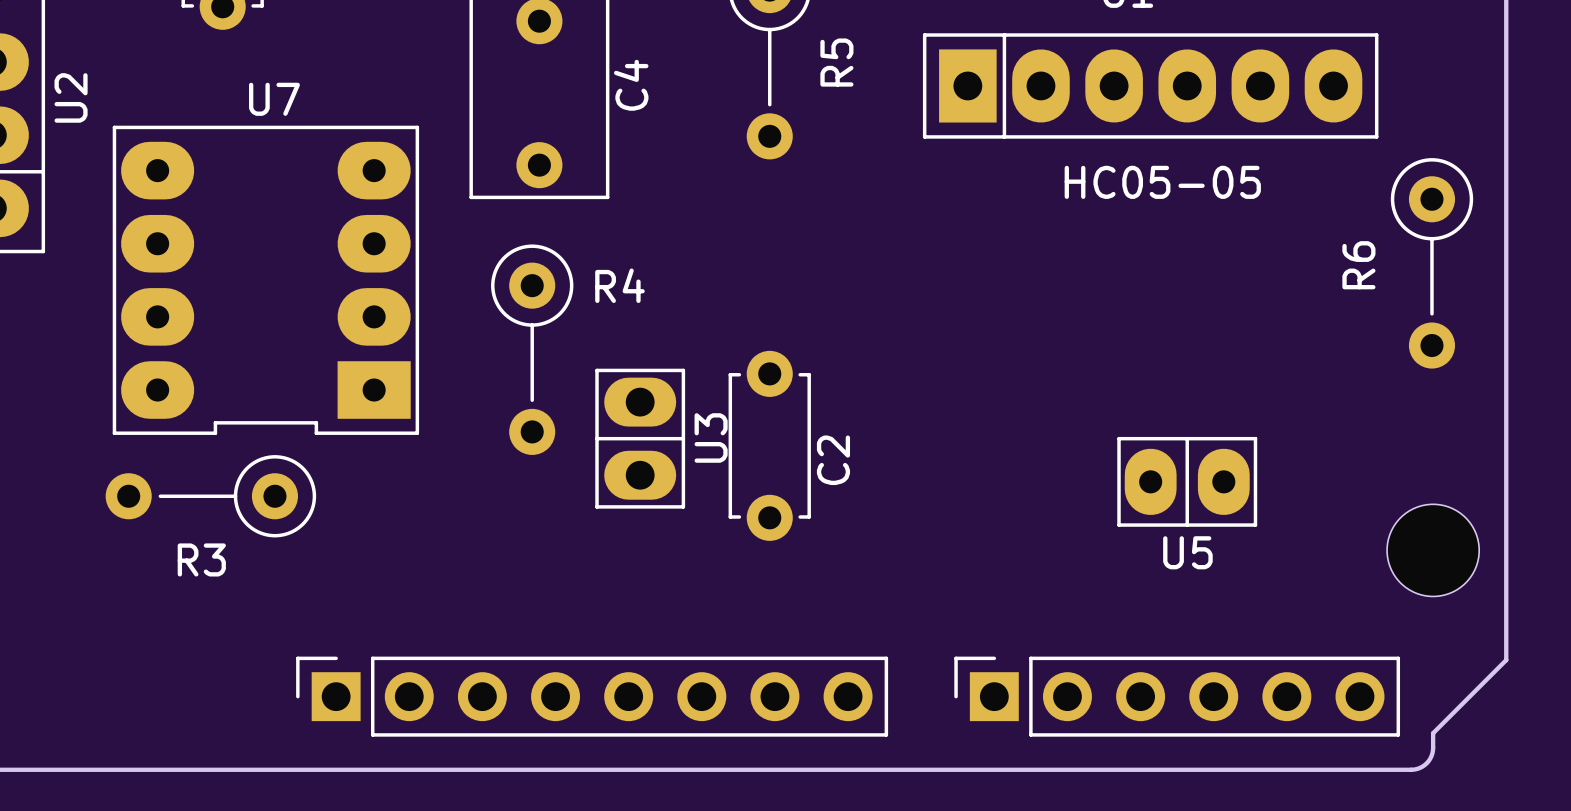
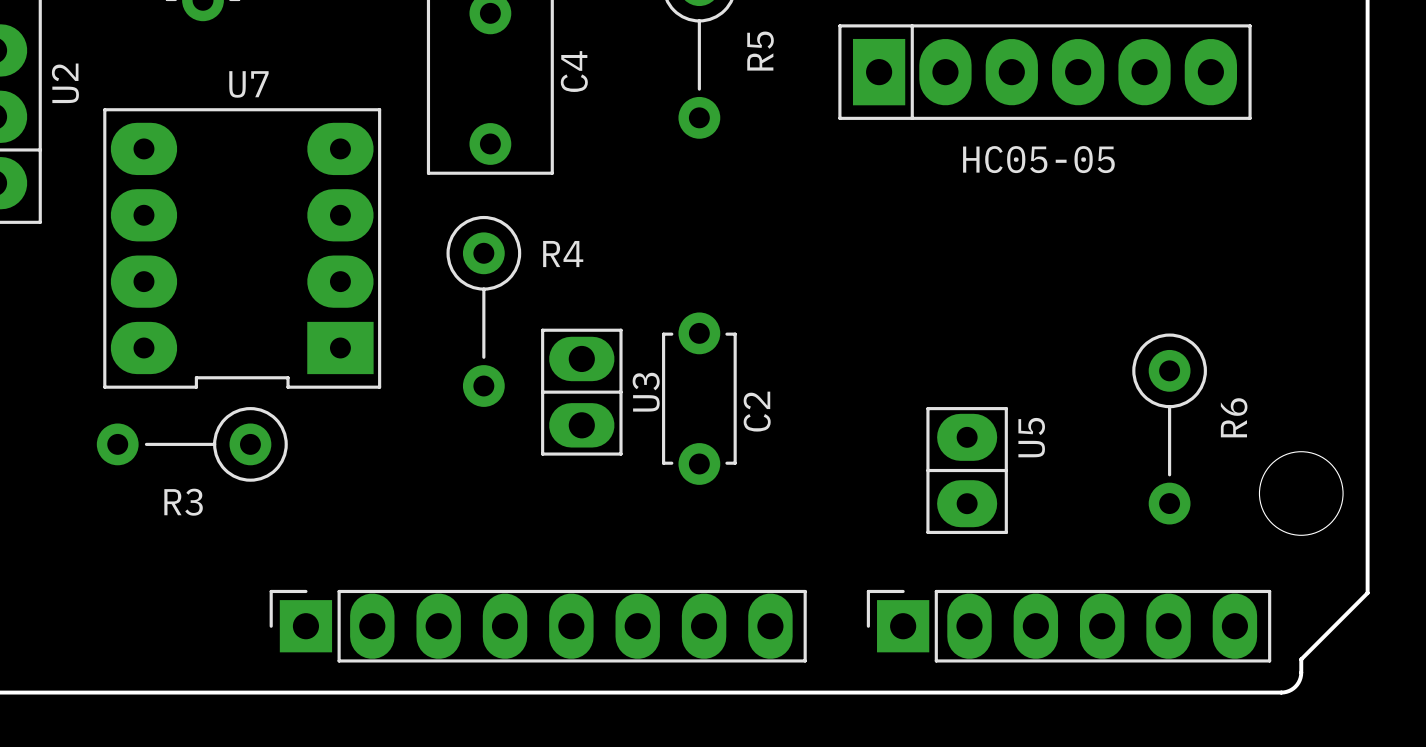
R6 position: (1431, 263) -> (1169, 428)
R6 name position: R6 (1358, 265) -> R6 (1234, 417)
U5 rotation: 0° (1187, 481) -> 90° clockwise (967, 470)
U5 position: (1187, 481) -> (967, 470)
U5 name position: U5 (1187, 552) -> U5 (1031, 437)
part footprint: [296, 656, 889, 737] -> [269, 589, 807, 663]
part footprint: [954, 656, 1401, 737] -> [866, 589, 1272, 663]

